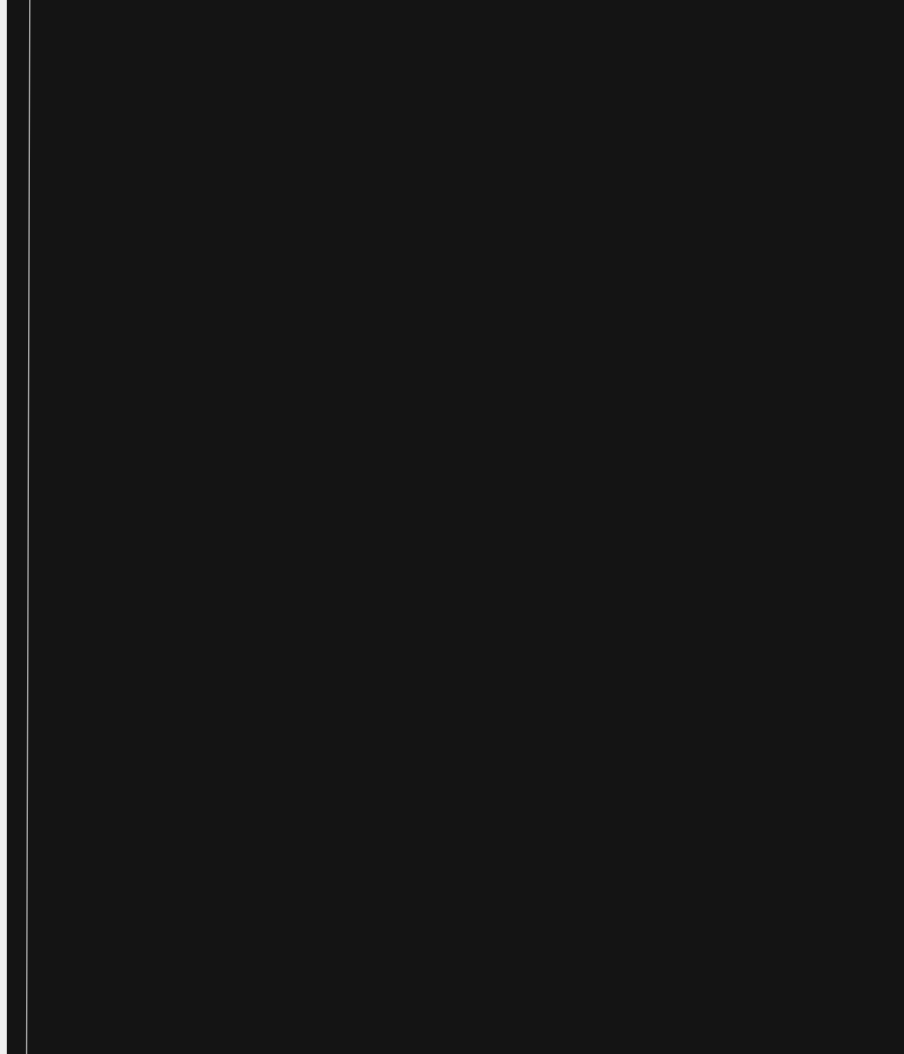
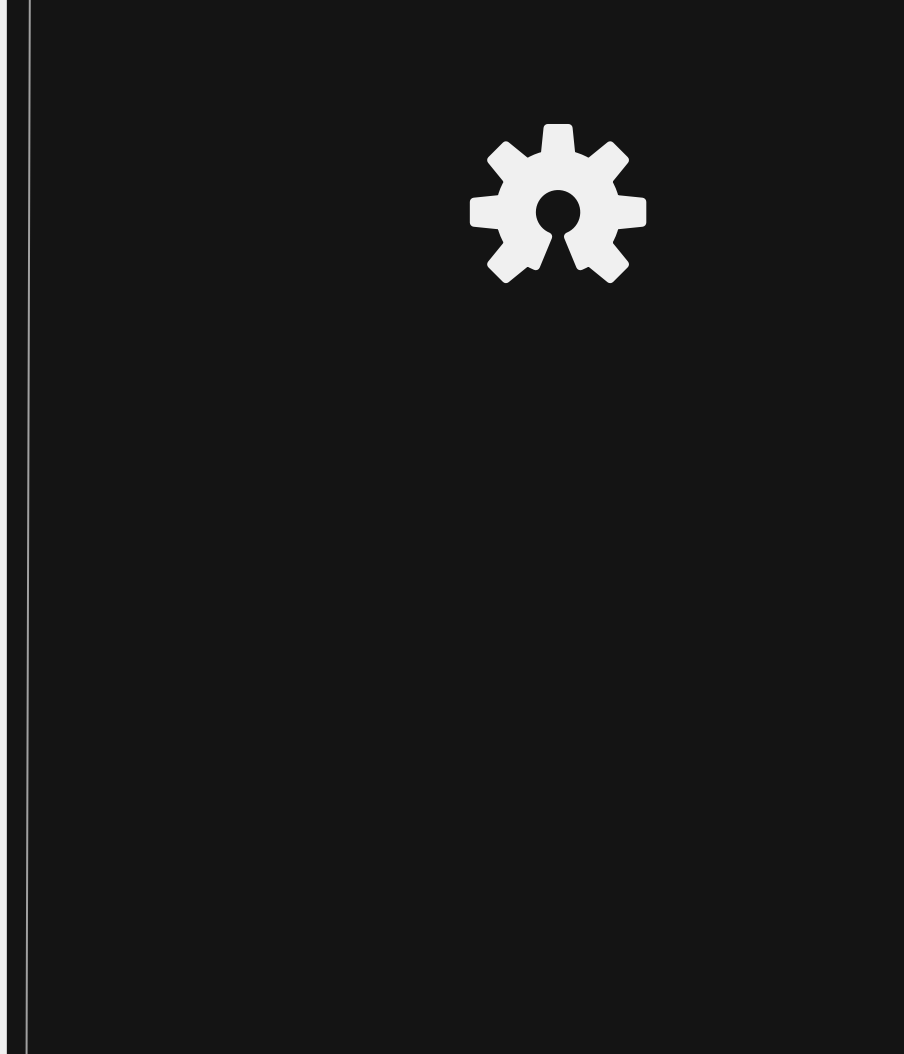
drawing: none -> [469, 123, 647, 284]

